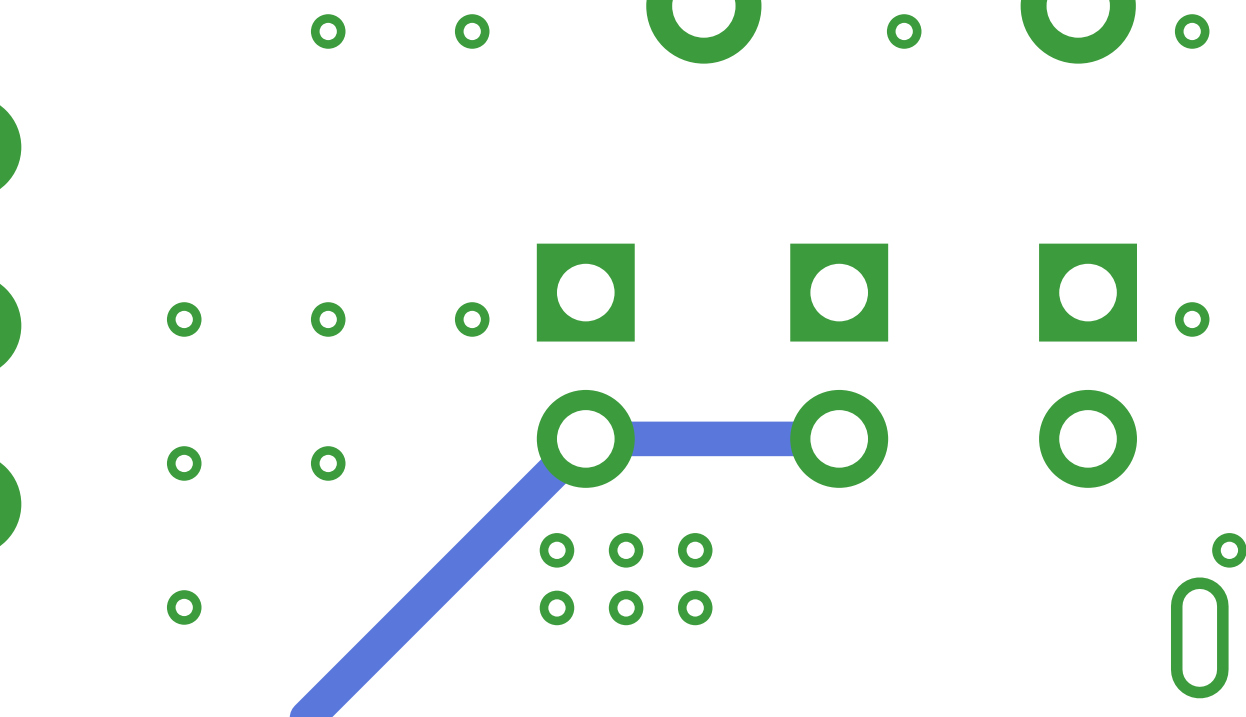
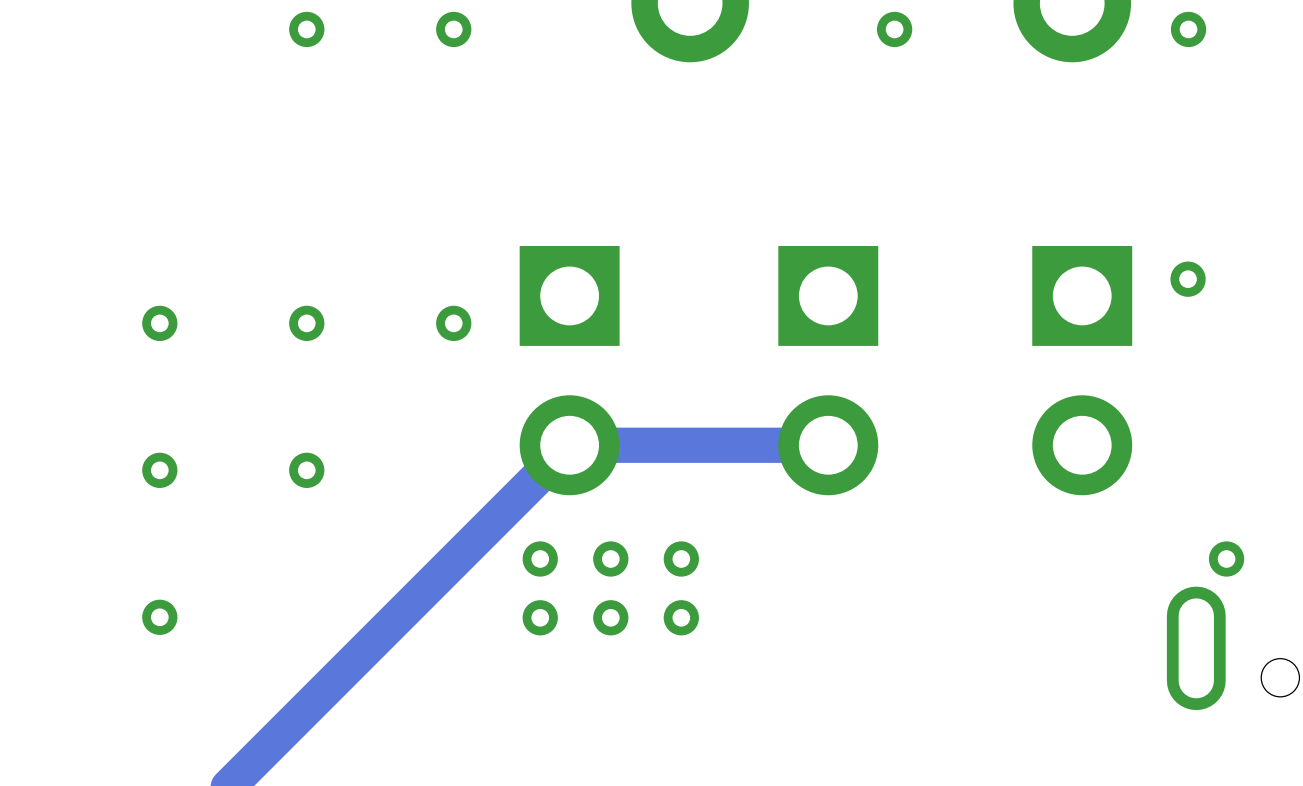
via position: (1192, 319) -> (1188, 279)

